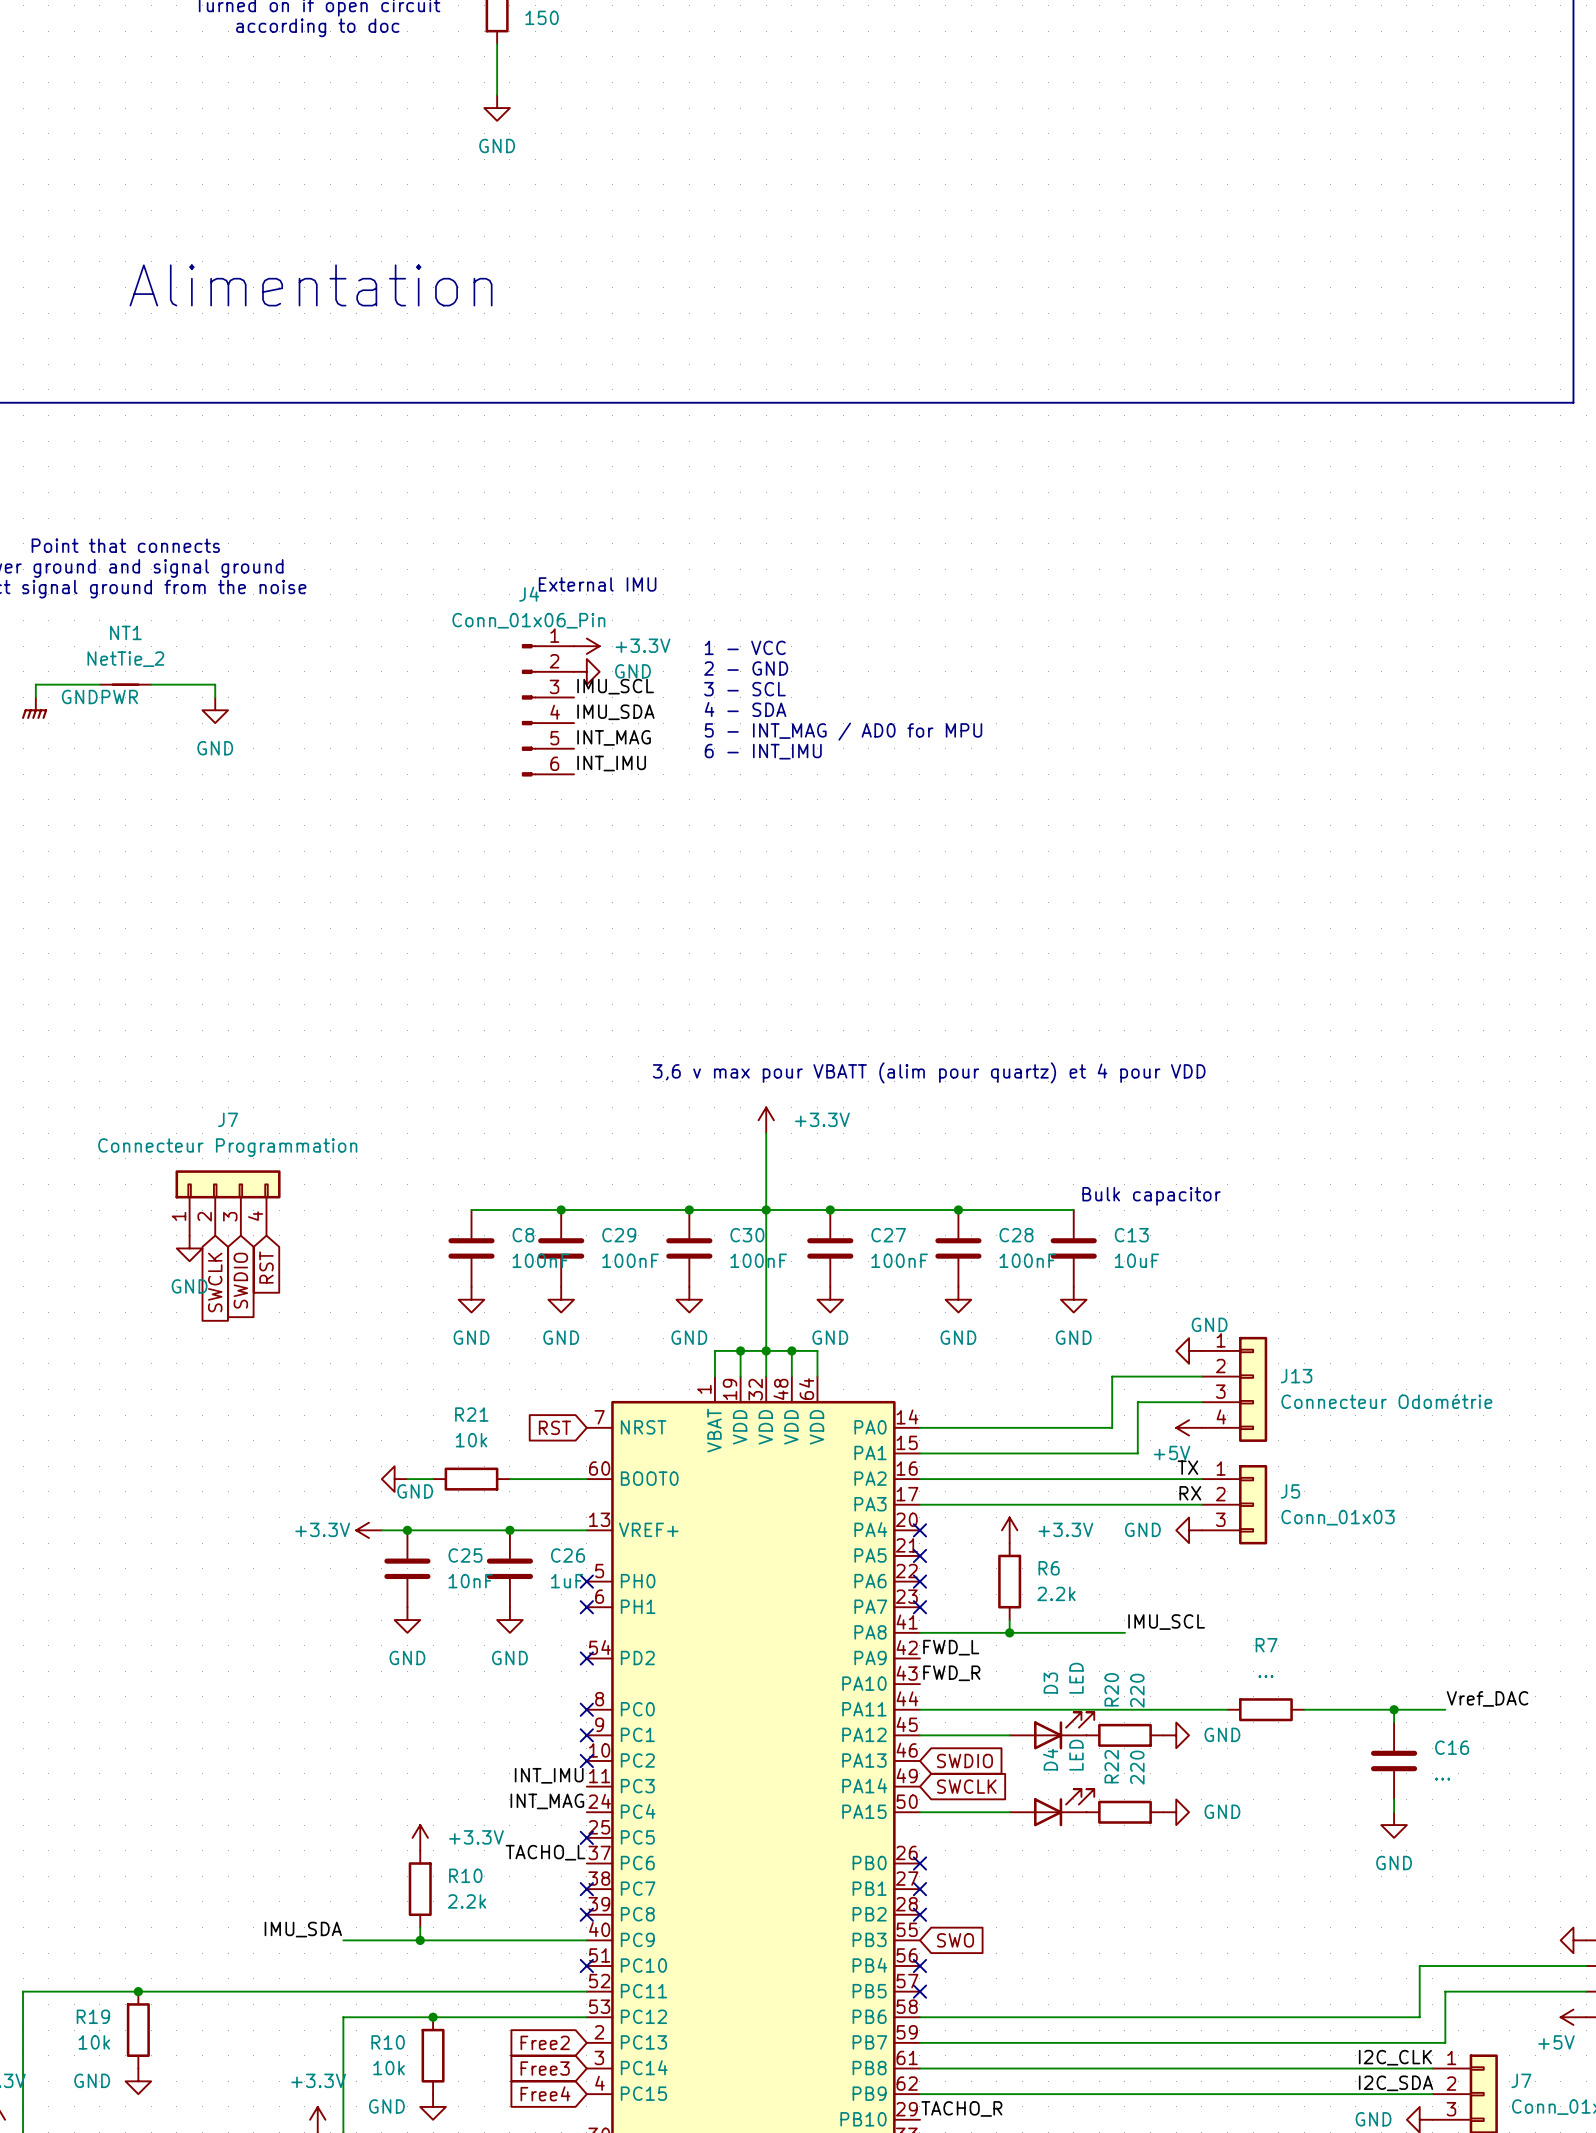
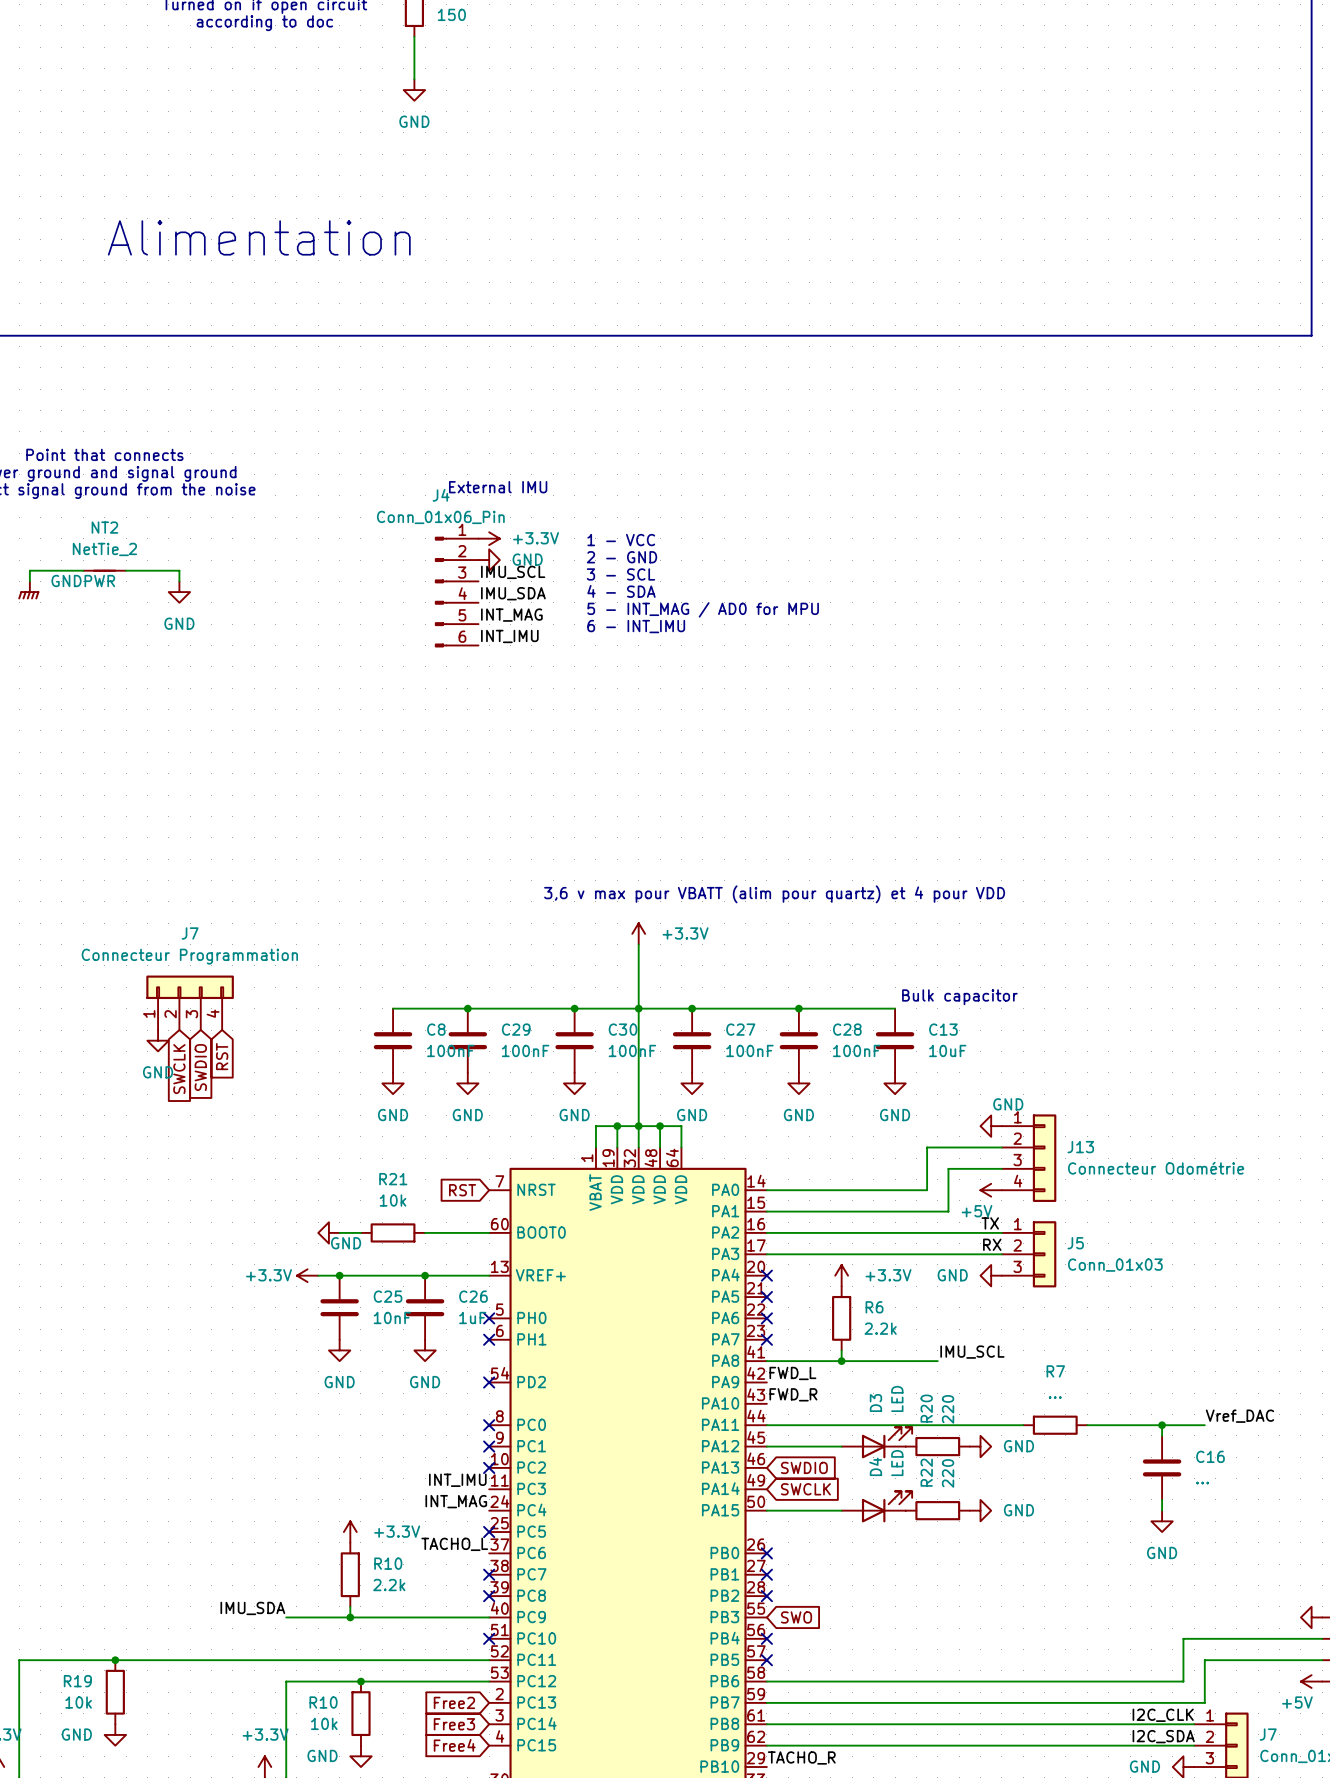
NT1 name: NT1 (125, 632) -> NT2 (104, 527)

